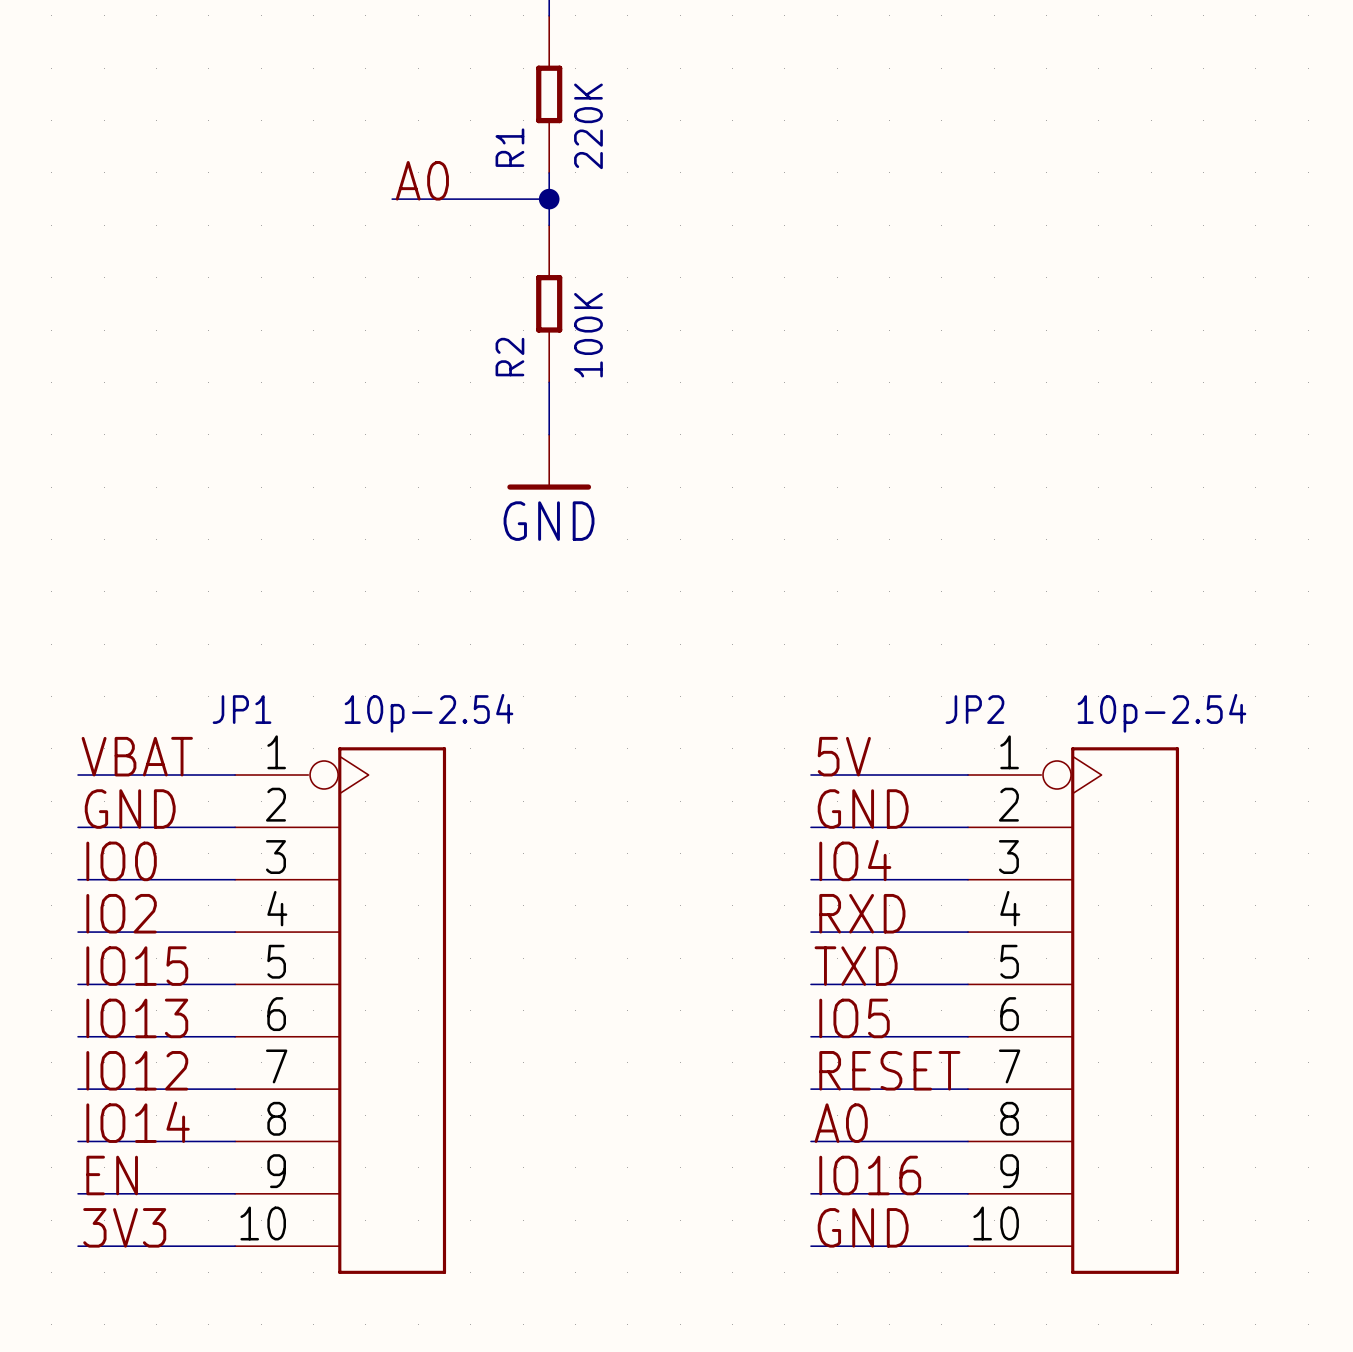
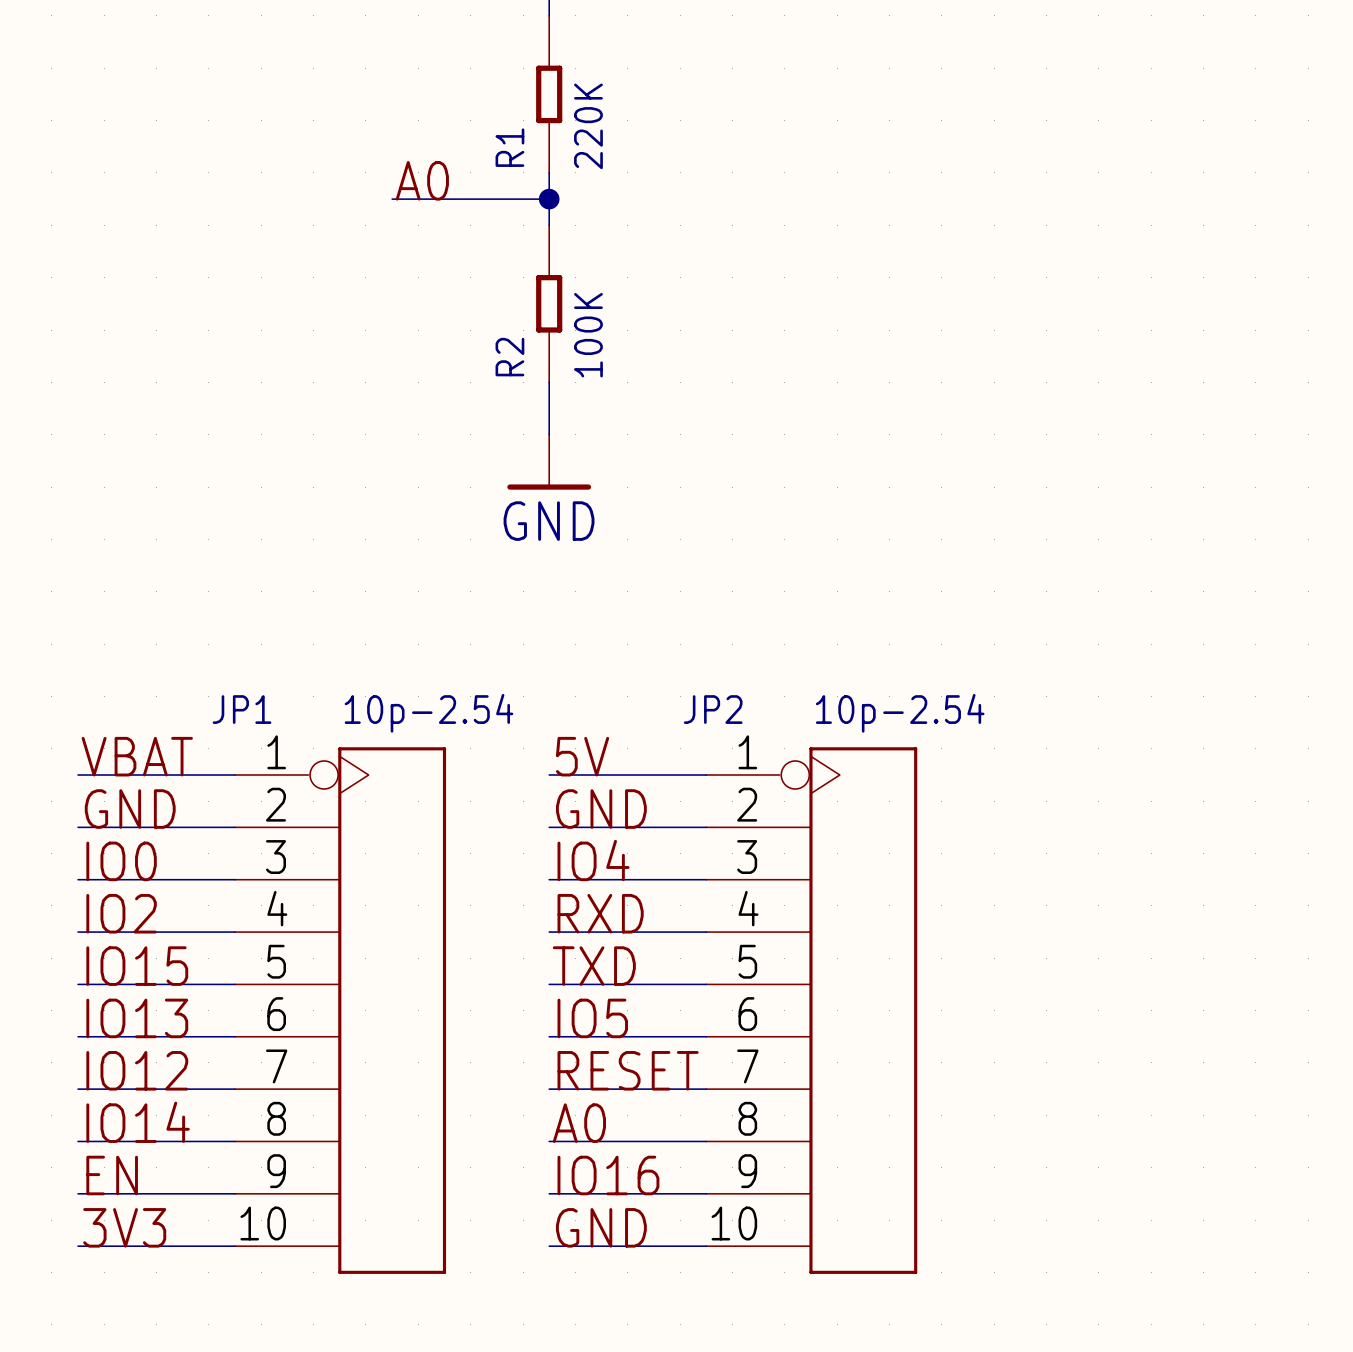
label position: 5V (844, 756) -> 5V (582, 756)
wire: (810, 775) (968, 775) -> (549, 775) (706, 775)
label: none -> GND (601, 809)
label: GND (863, 809) -> none
wire: (810, 827) (968, 827) -> (549, 827) (706, 827)
label position: IO4 (855, 860) -> IO4 (593, 860)
wire: (810, 879) (968, 879) -> (549, 879) (706, 879)
label position: RXD (862, 913) -> RXD (600, 913)
wire: (810, 932) (968, 932) -> (549, 932) (706, 932)
label position: TXD (856, 966) -> TXD (594, 966)
wire: (810, 984) (968, 984) -> (549, 984) (706, 984)
JP2 position: (1073, 1010) -> (811, 1010)
label position: IO5 (854, 1018) -> IO5 (592, 1018)
wire: (810, 1036) (968, 1036) -> (549, 1036) (706, 1036)
label position: RESET (889, 1070) -> RESET (628, 1070)
wire: (810, 1089) (968, 1089) -> (549, 1089) (706, 1089)
label position: A0 (841, 1123) -> A0 (579, 1123)
wire: (810, 1141) (968, 1141) -> (549, 1141) (706, 1141)
label position: IO16 (870, 1175) -> IO16 (608, 1175)
wire: (810, 1193) (968, 1193) -> (549, 1193) (706, 1193)
label: none -> GND (601, 1227)
label: GND (863, 1227) -> none
wire: (810, 1246) (968, 1246) -> (549, 1246) (706, 1246)

